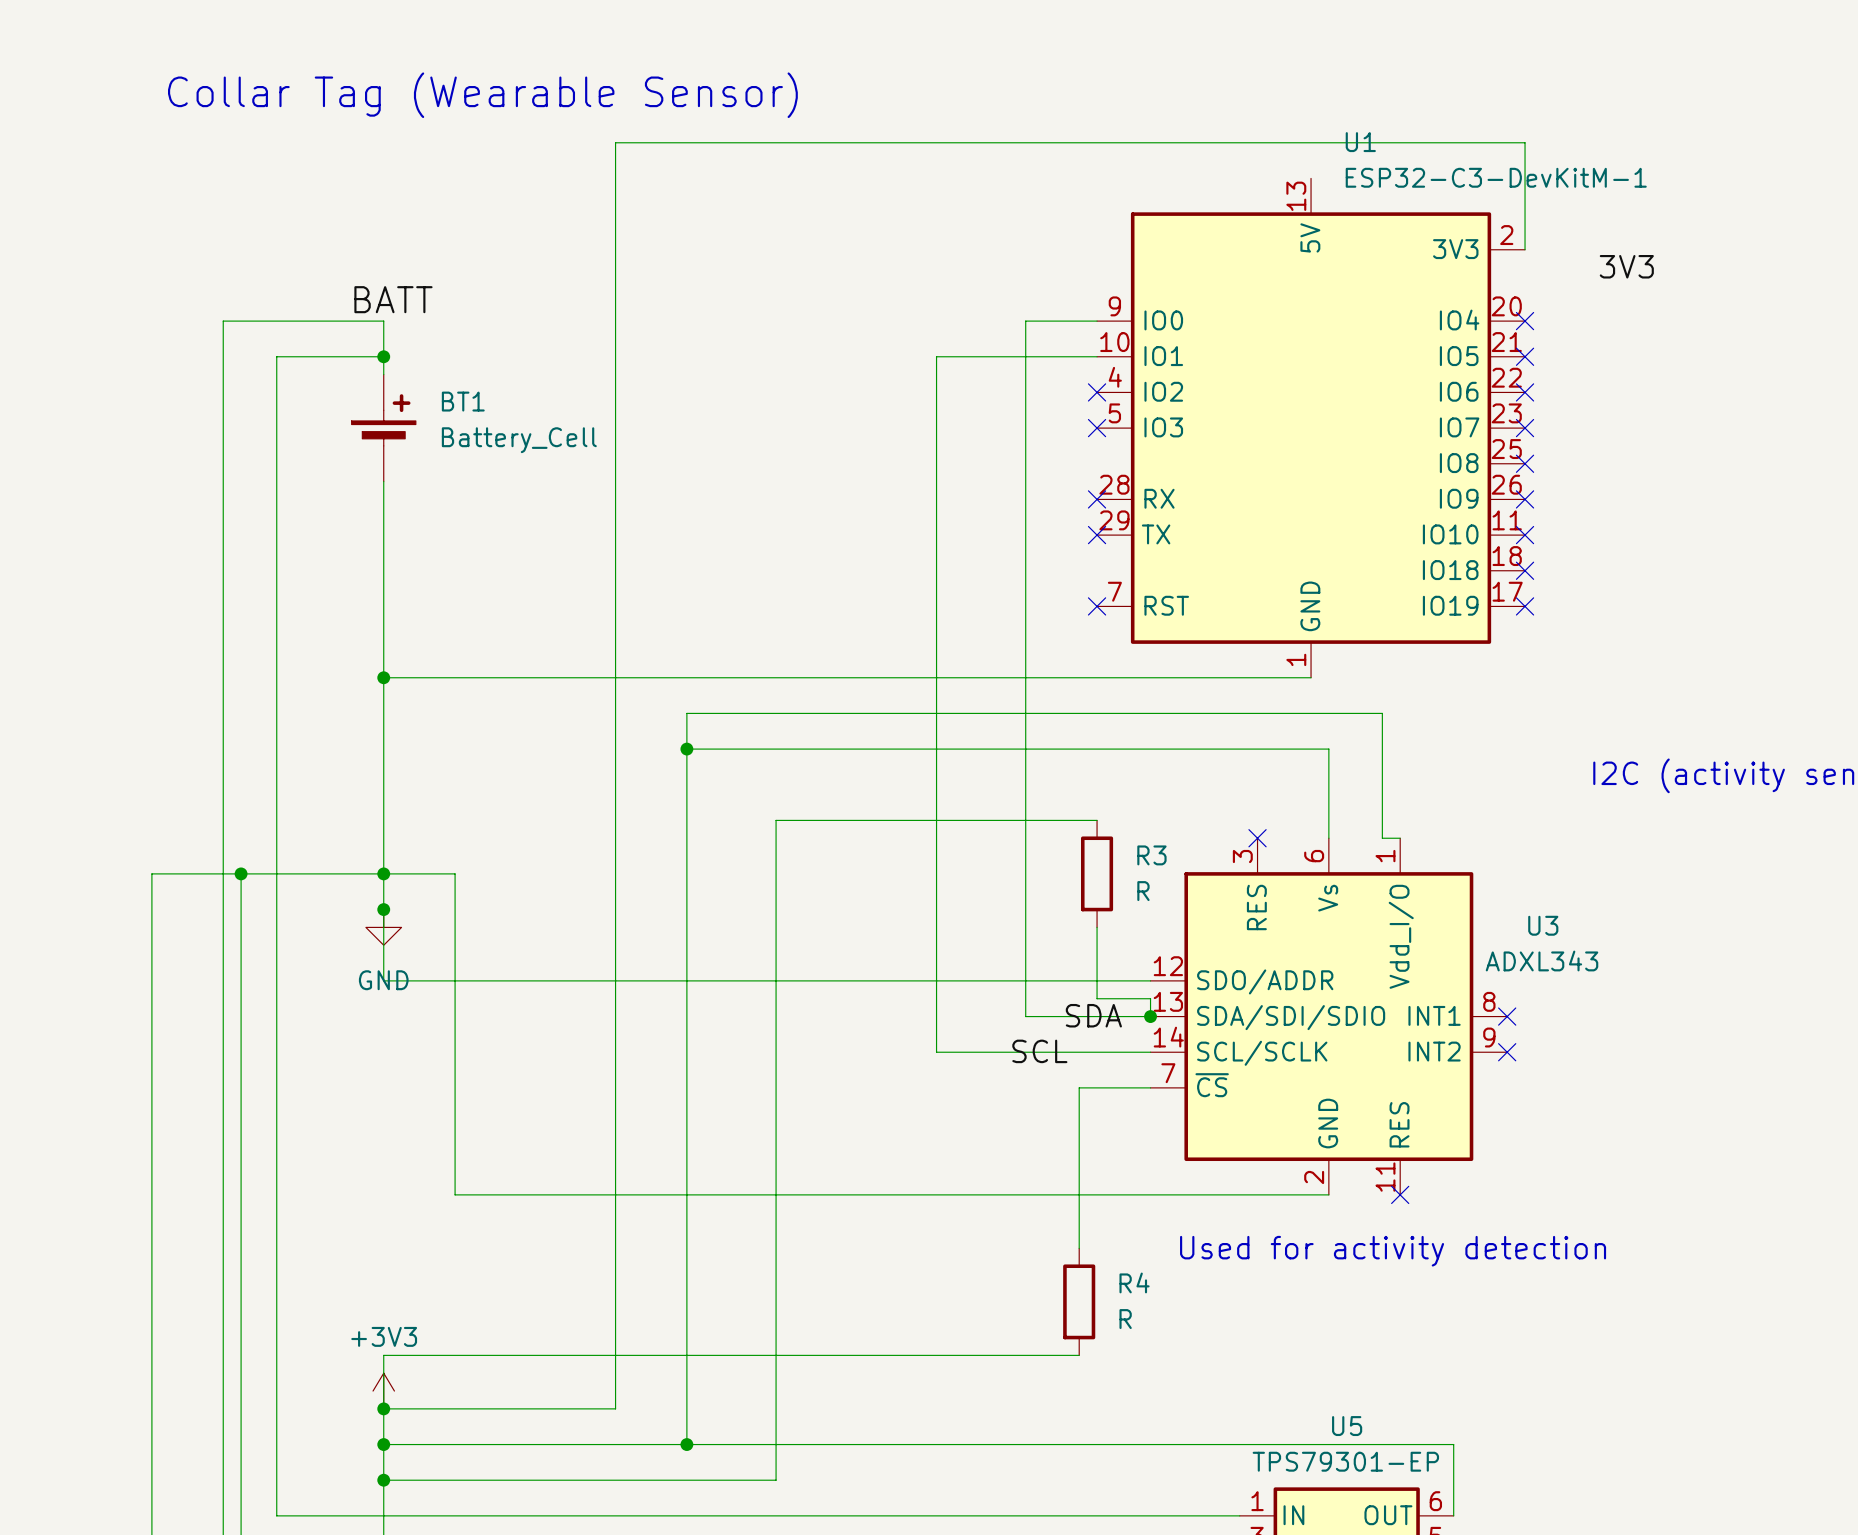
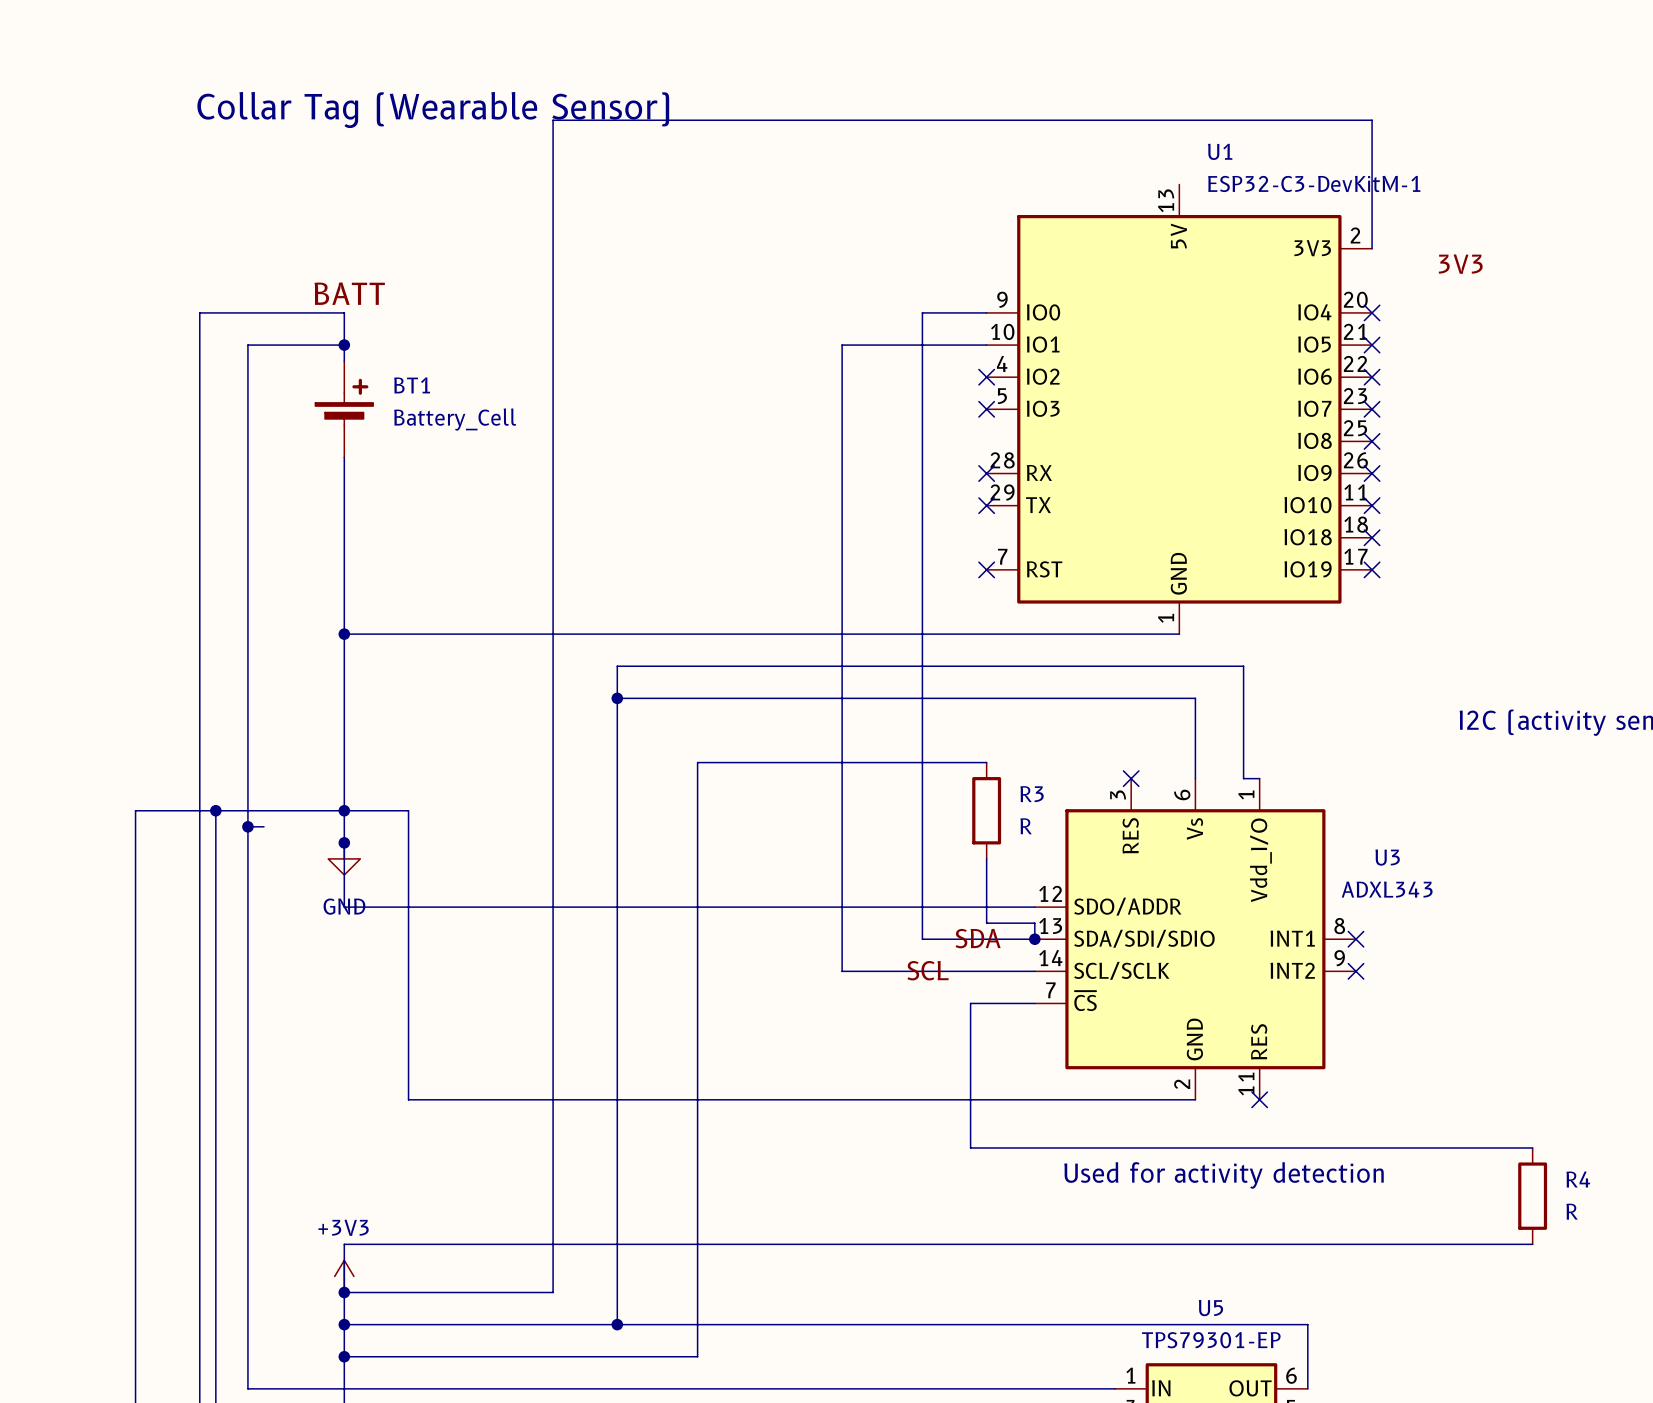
wire: (615, 142) (1525, 142) -> (553, 152) (553, 120) (1372, 120) (1372, 152)
wire: none -> (247, 826) (264, 826)
junction: none -> (247, 826)
wire: none -> (970, 1147) (1532, 1147)
text position: Used for activity detection (1393, 1251) -> Used for activity detection (1223, 1175)
R4 position: (1079, 1301) -> (1532, 1196)
wire: none -> (970, 1244) (1532, 1244)

